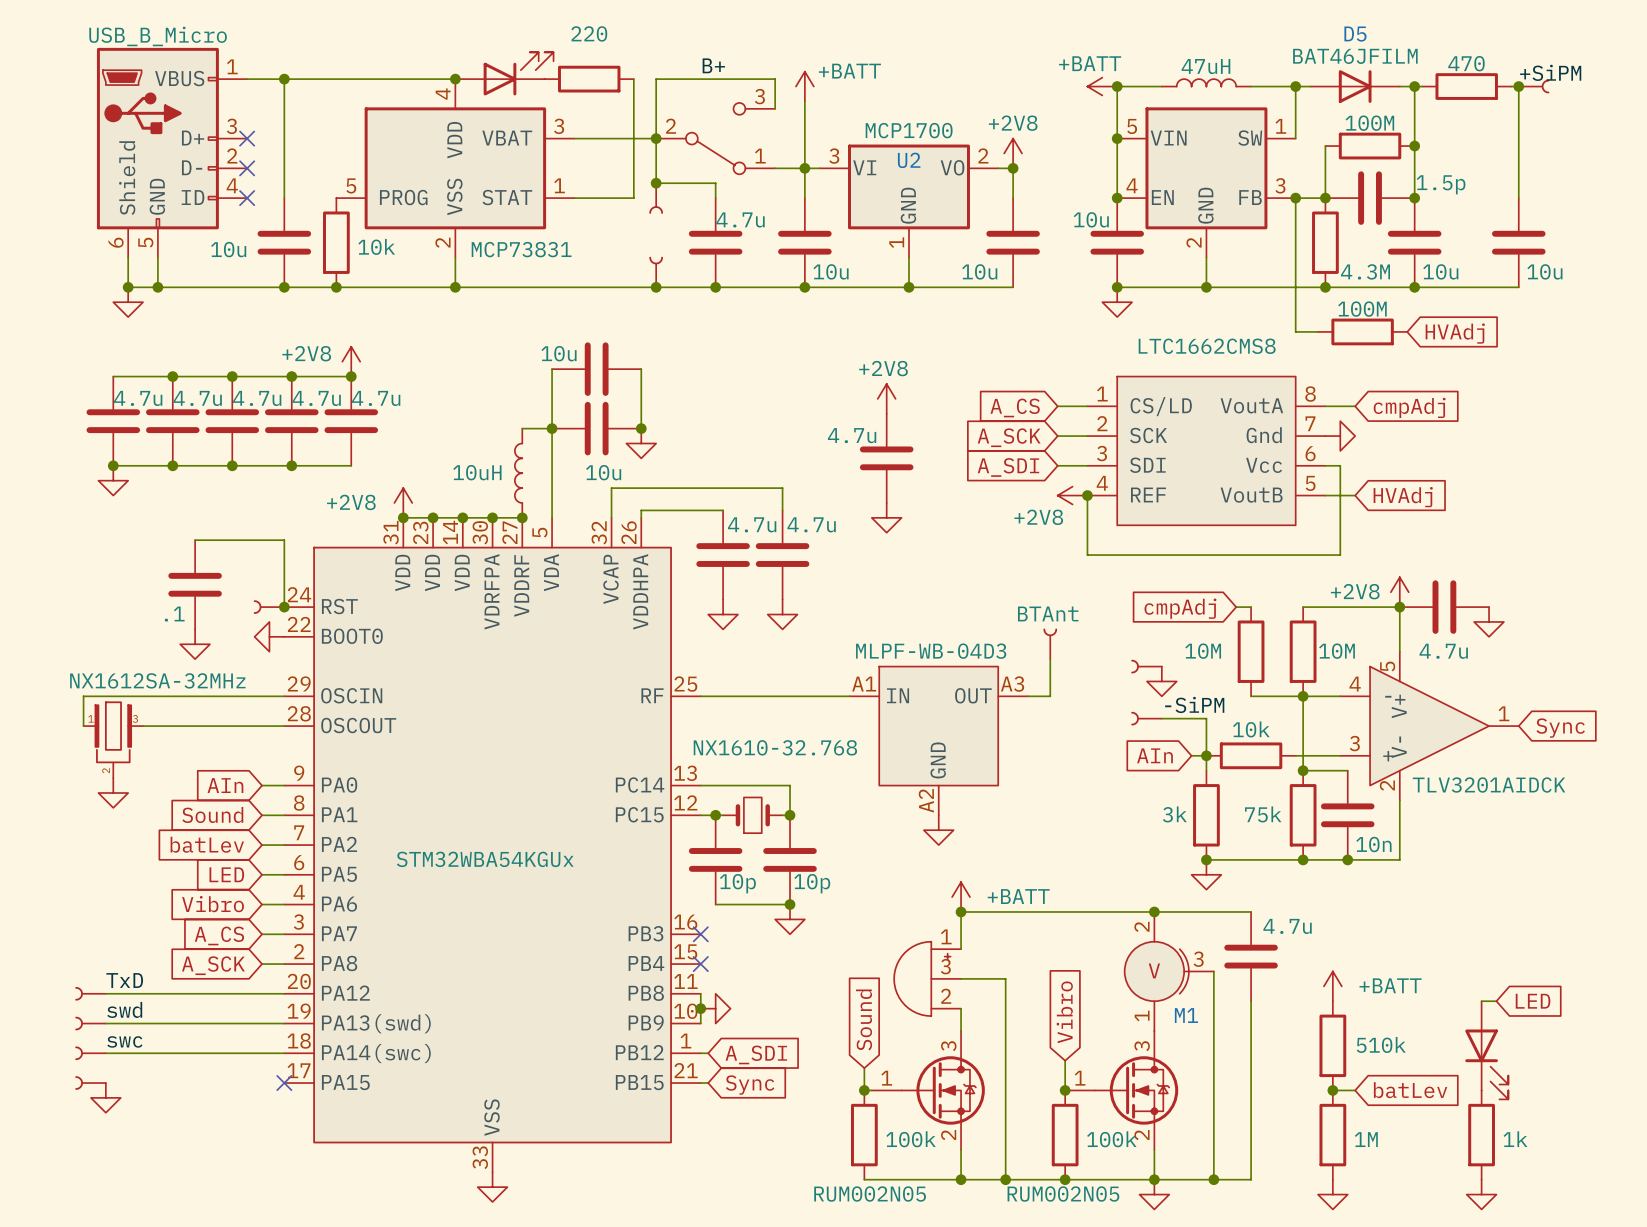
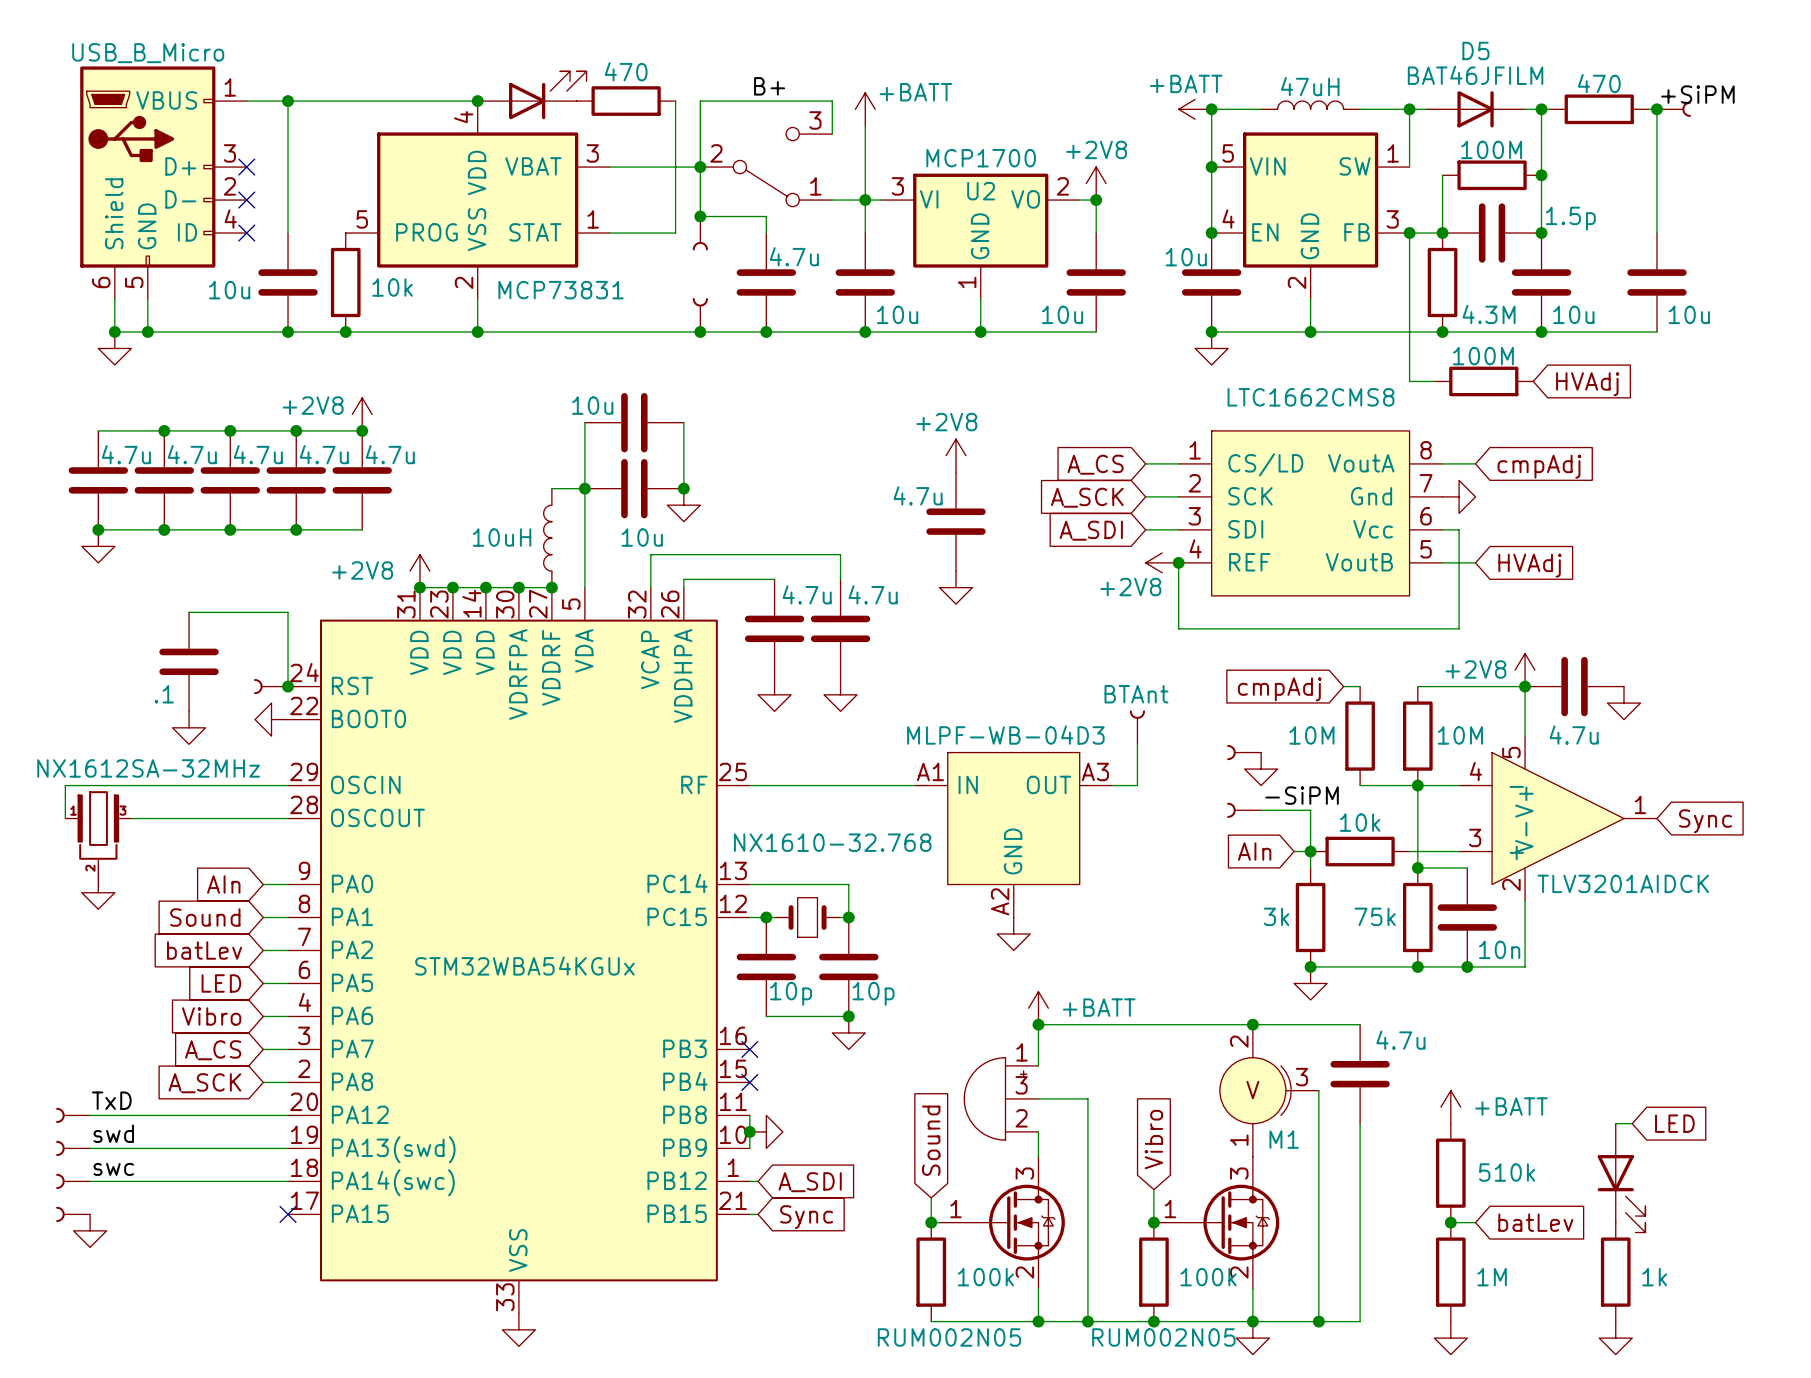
part value: 220 (589, 33) -> 470 (626, 71)

